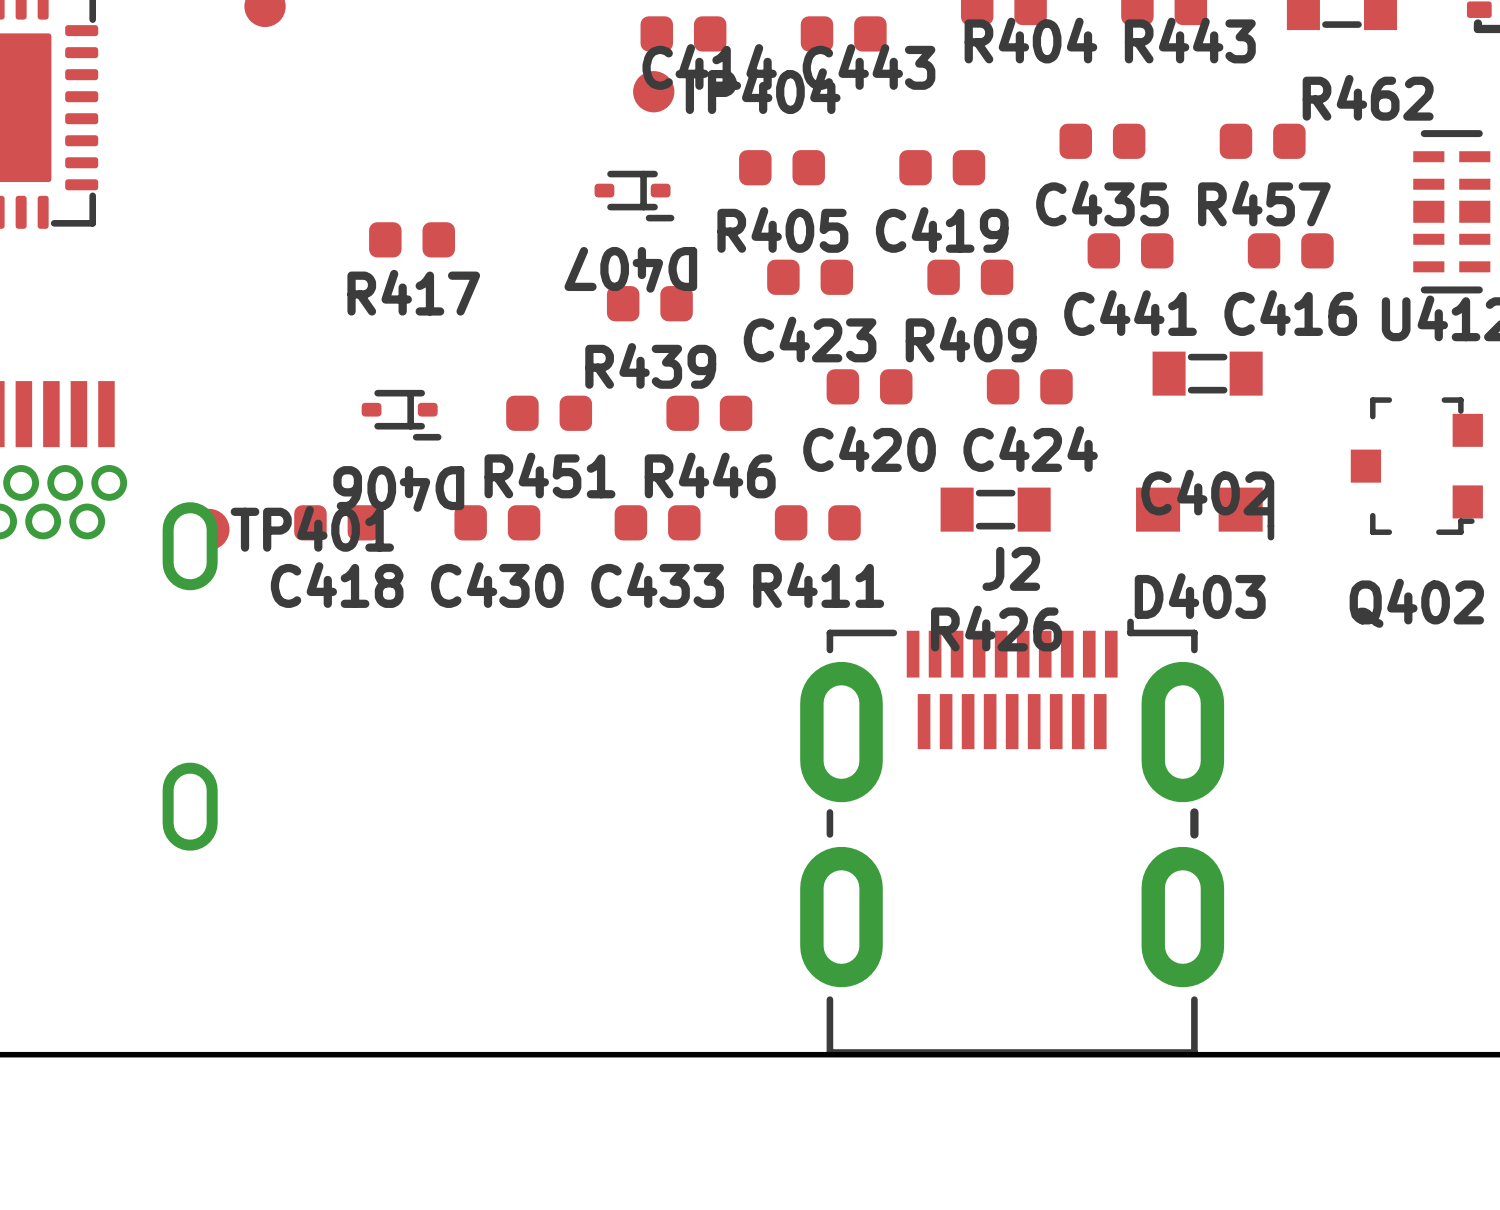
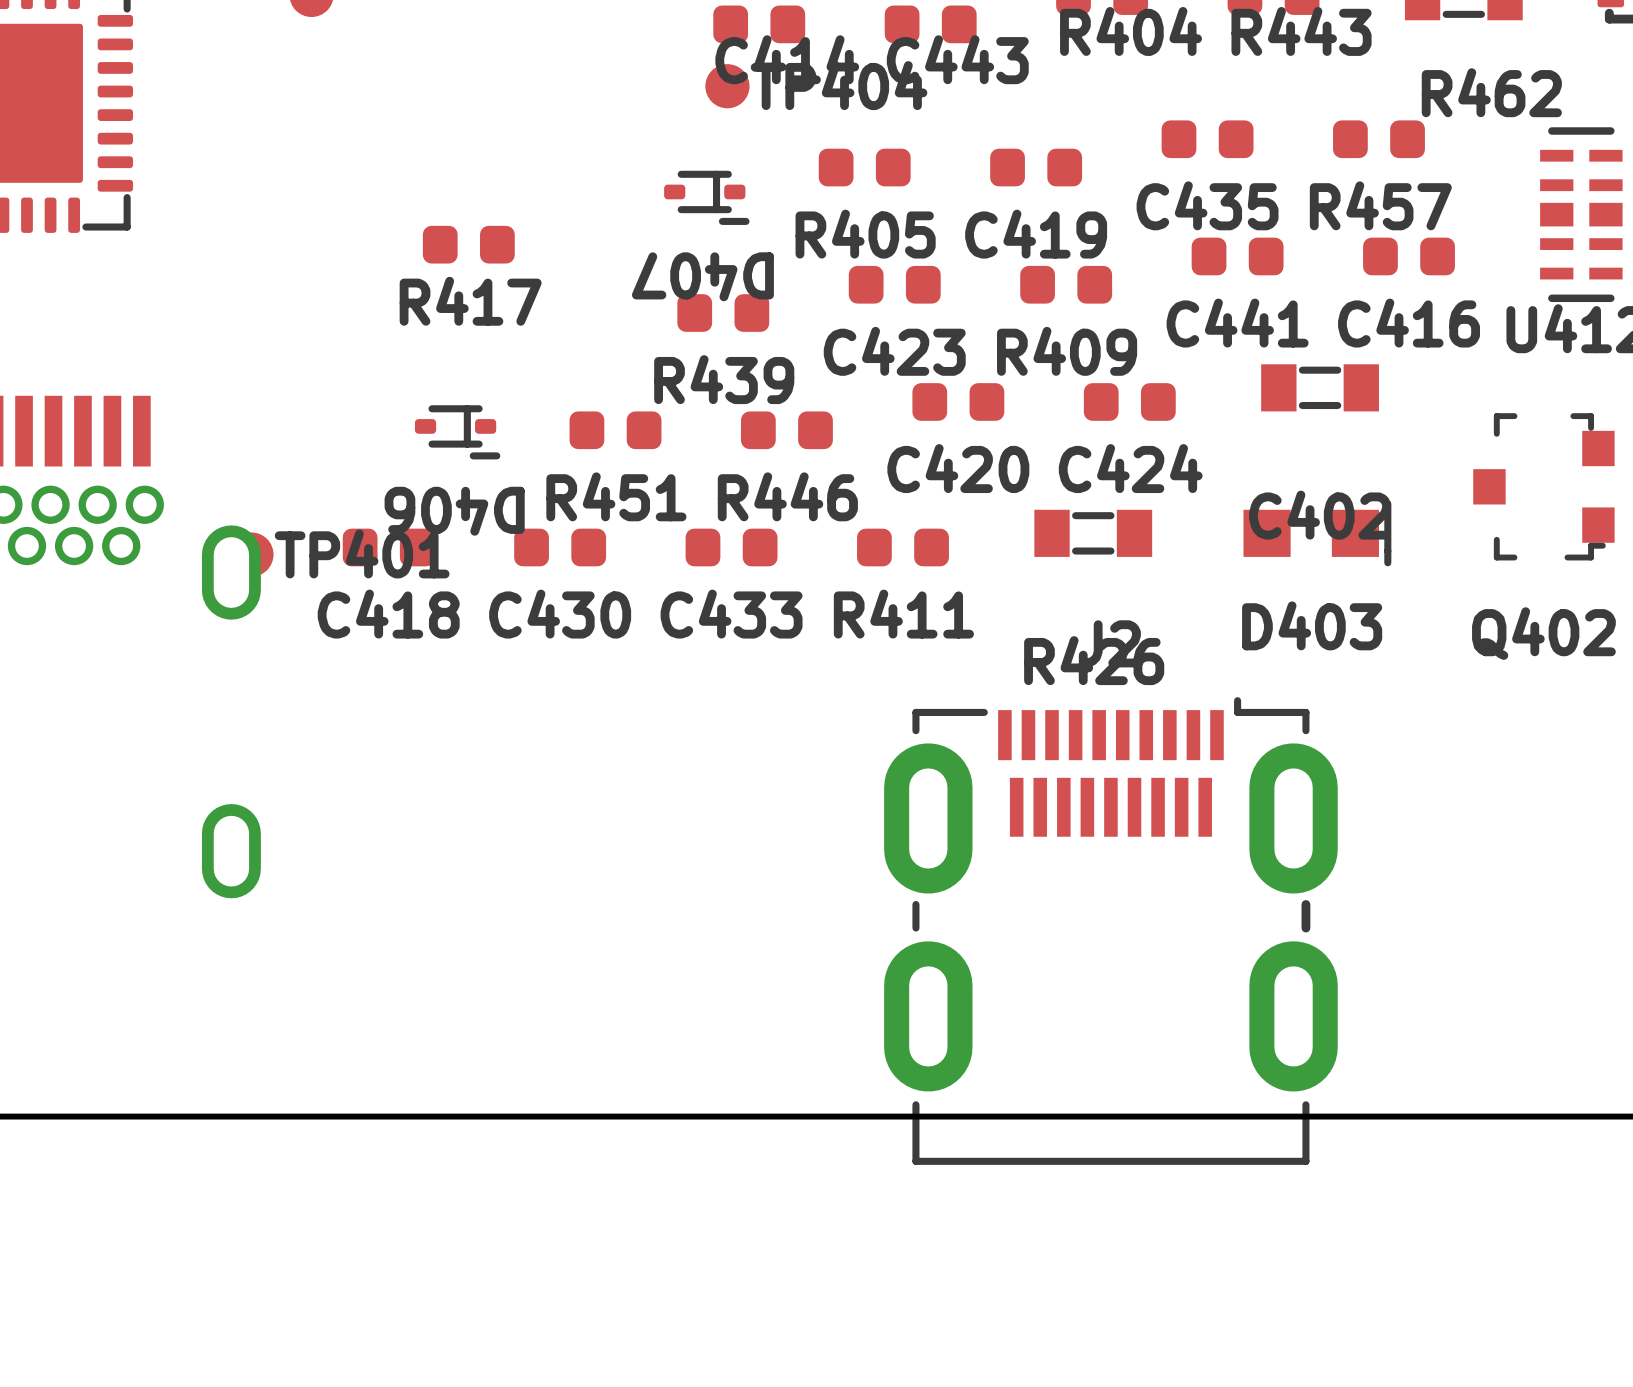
J2 position: (1012, 837) -> (1110, 931)

